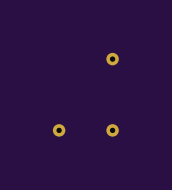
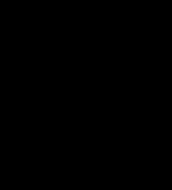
via: (112, 59) -> none
via: (59, 130) -> none
via: (112, 130) -> none

